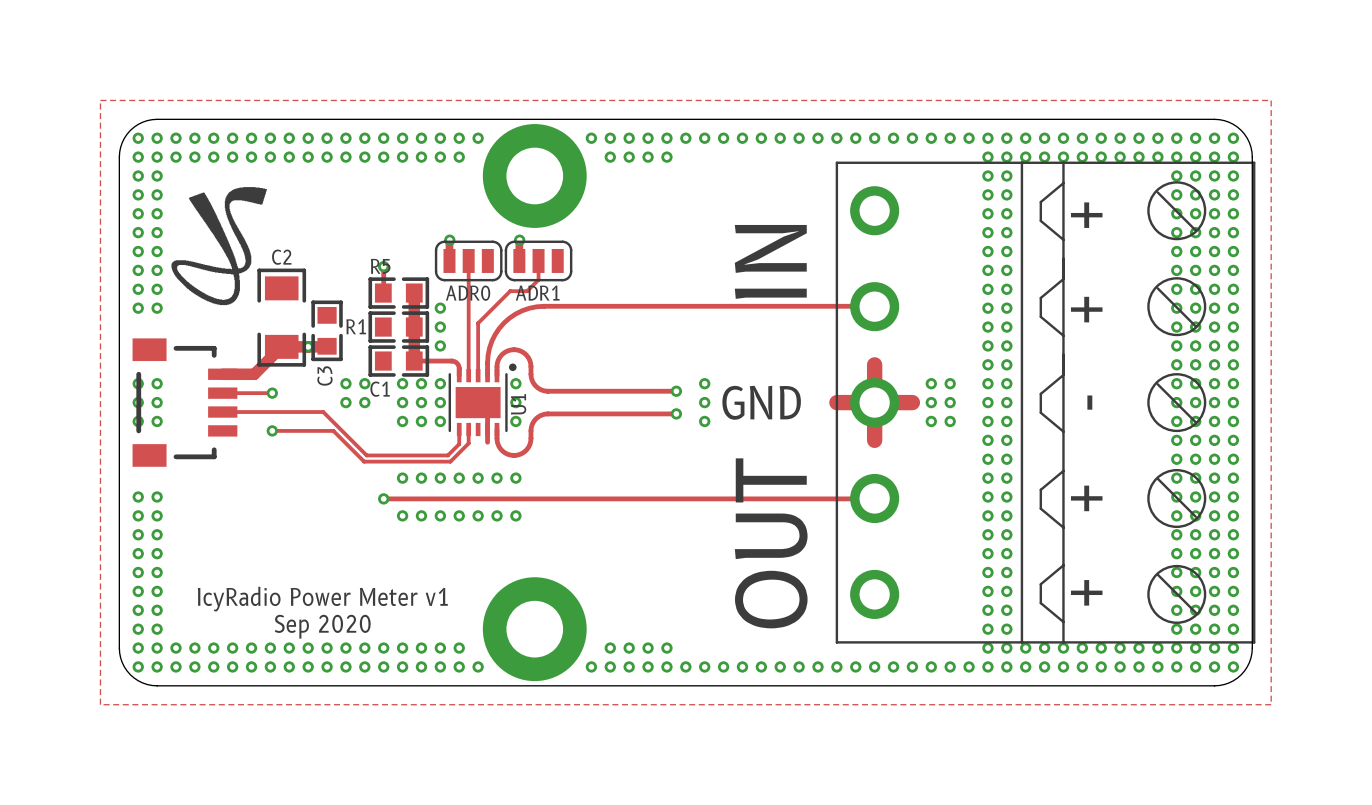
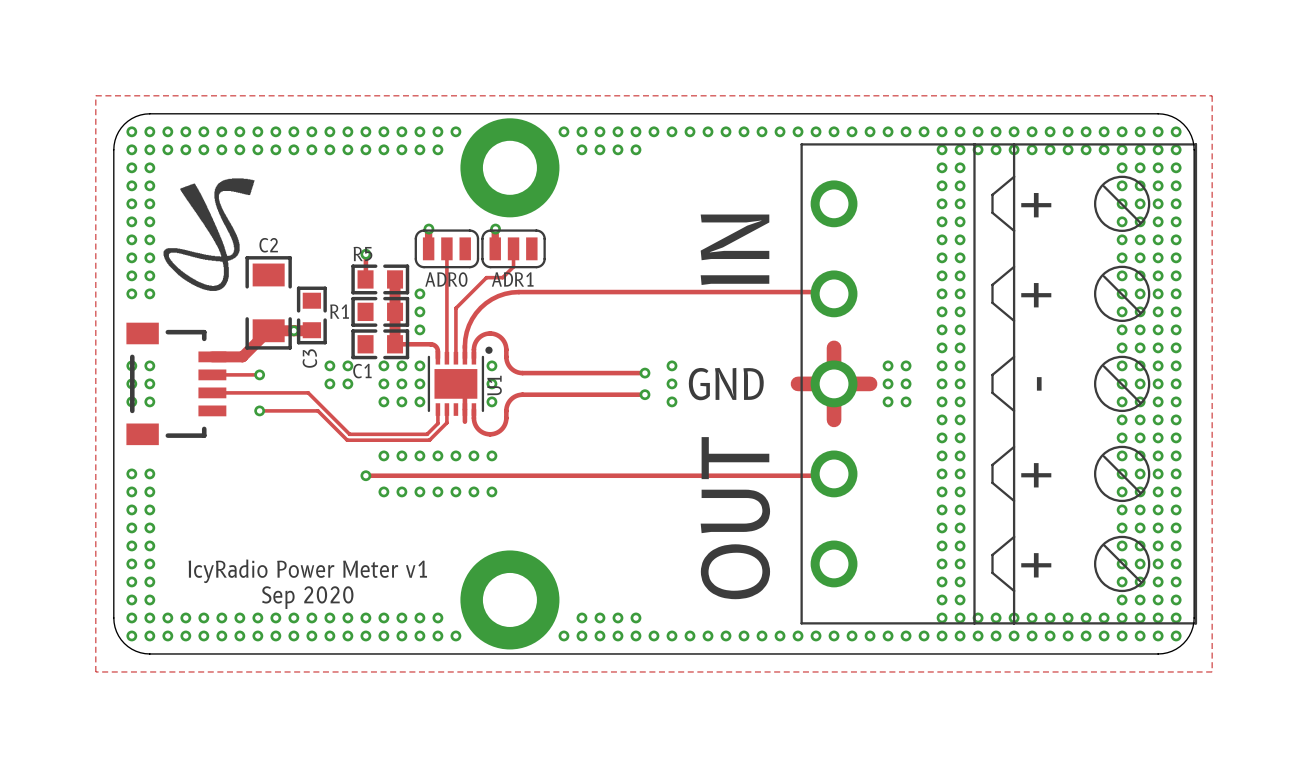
part footprint: [835, 161, 1256, 644] -> [800, 143, 1198, 625]

